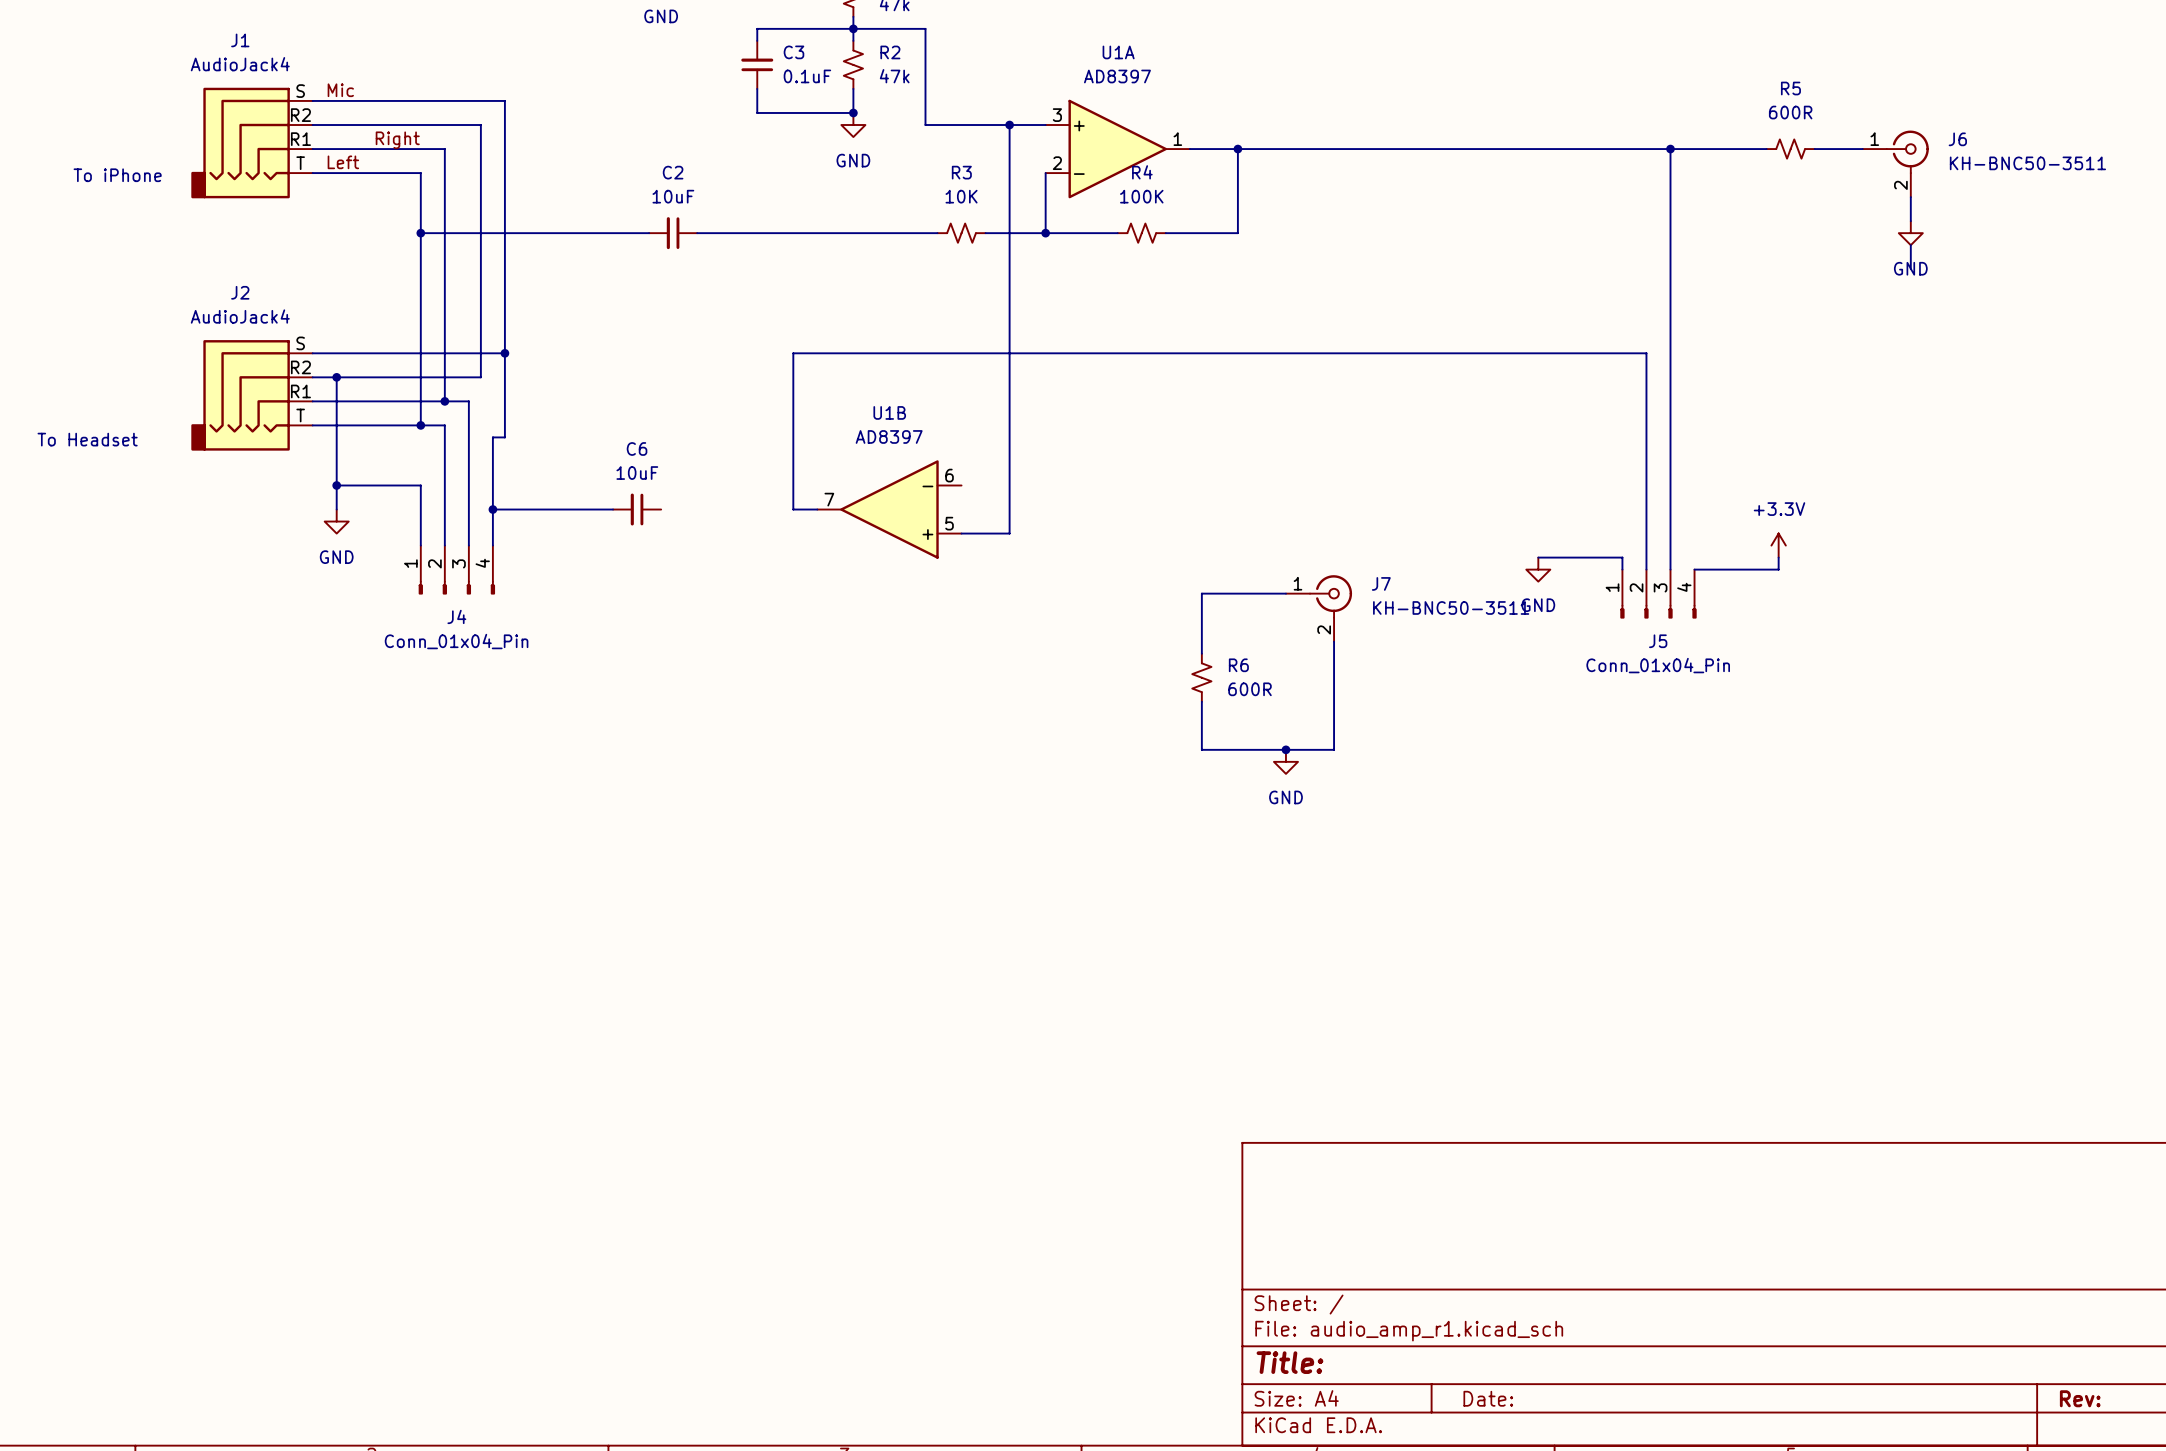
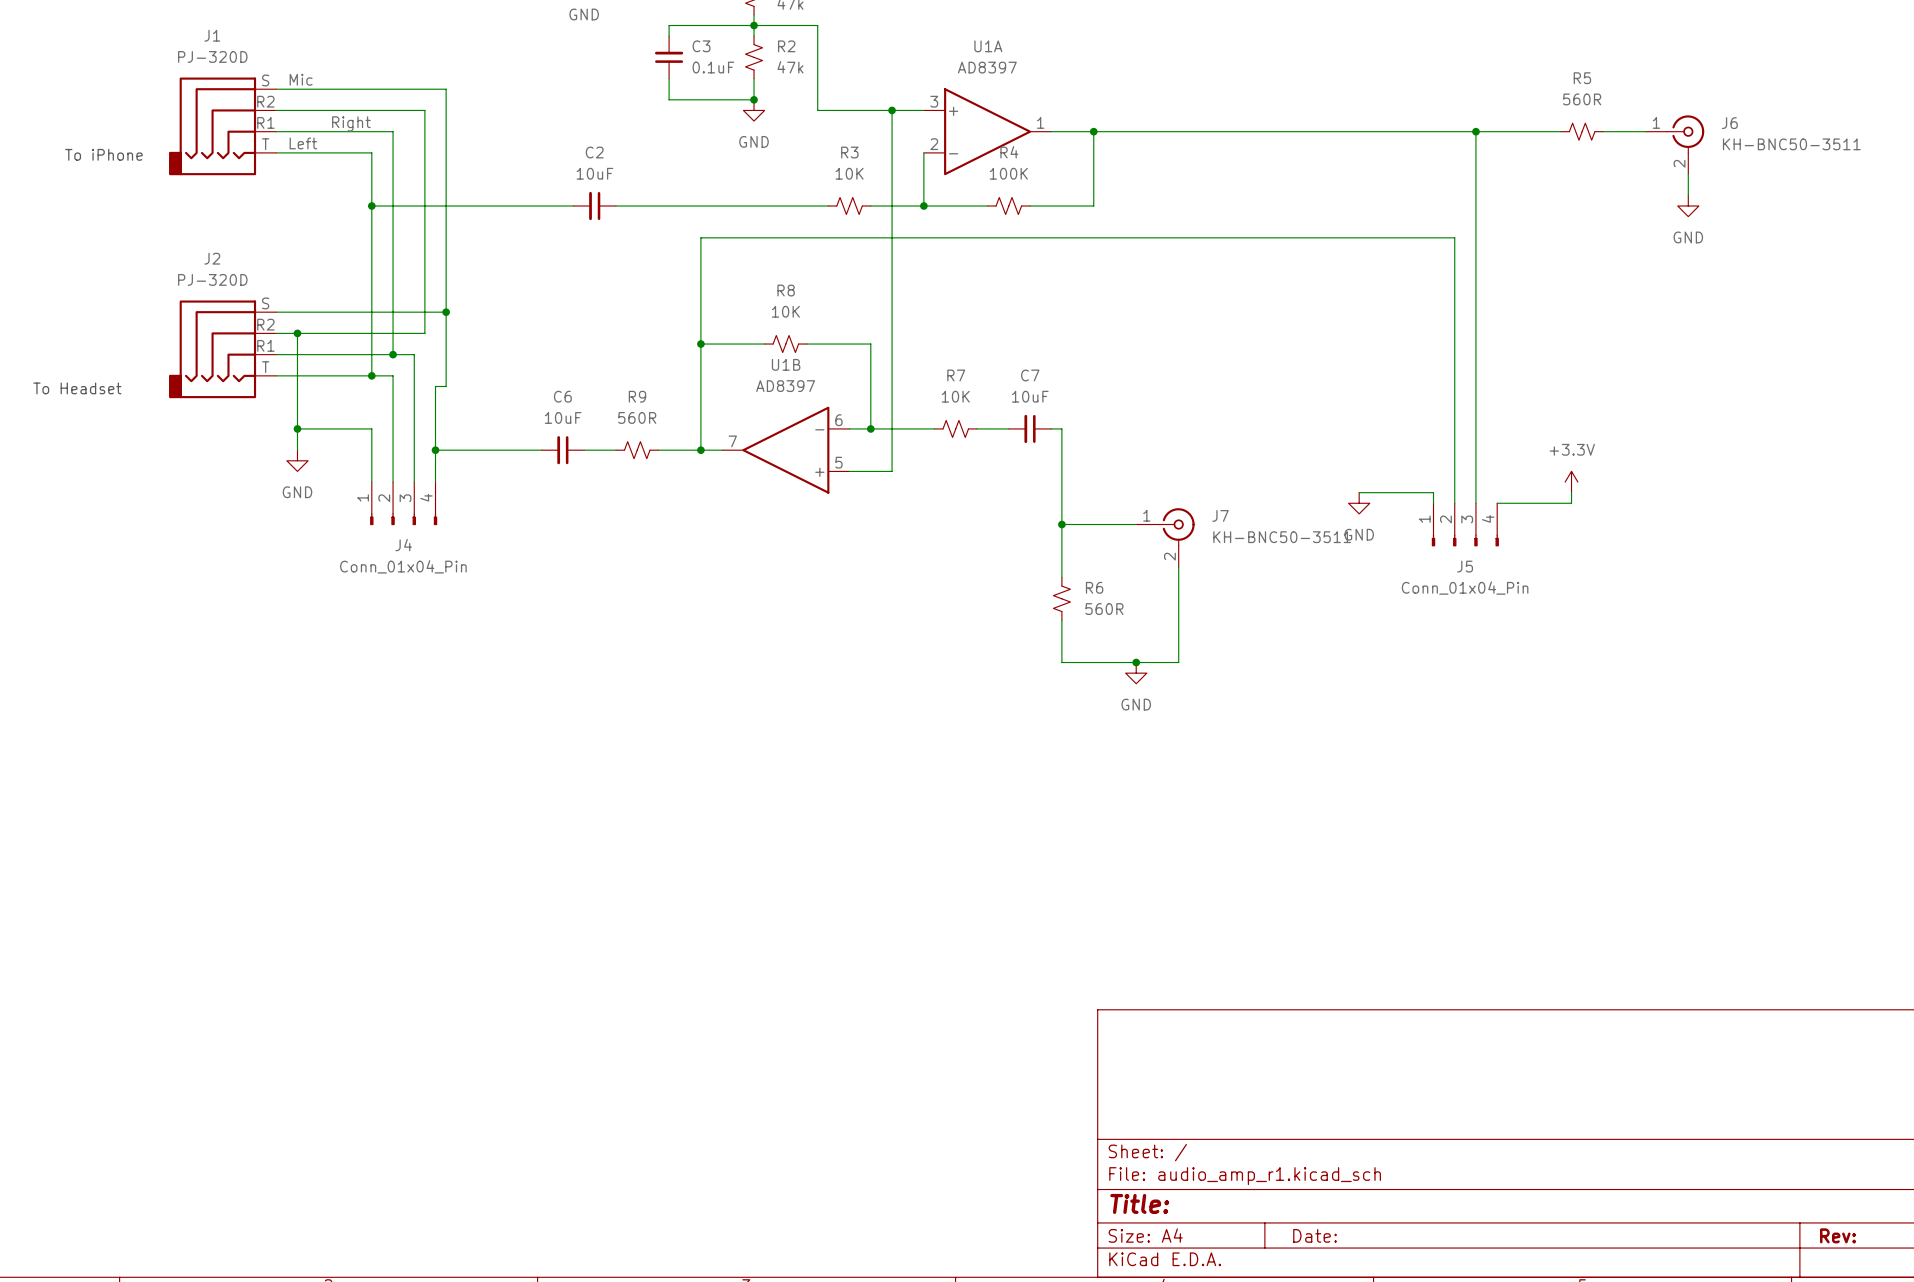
J1 value: AudioJack4 (240, 64) -> PJ-320D (212, 56)
R5 value: 600R (1790, 112) -> 560R (1582, 99)
wire: (1910, 245) (1910, 269) -> none
J2 value: AudioJack4 (240, 316) -> PJ-320D (212, 279)
wire: (793, 353) (1646, 353) -> (700, 312) (700, 237) (1454, 237) (1454, 312)
wire: none -> (700, 344) (764, 344)
junction: none -> (700, 344)
R8: none -> 10K (785, 344)
wire: none -> (807, 344) (870, 344) (870, 428)
wire: none -> (849, 428) (934, 428)
junction: none -> (870, 428)
R7: none -> 10K (955, 428)
wire: none -> (976, 428) (1008, 428)
C7: none -> 10uF (1030, 428)
wire: none -> (1051, 428) (1061, 428) (1061, 524)
wire: none -> (584, 450) (616, 450)
R9: none -> 560R (637, 450)
wire: none -> (658, 450) (700, 450)
junction: none -> (700, 450)
junction: none -> (1061, 524)
R6 value: 600R (1250, 689) -> 560R (1104, 609)

